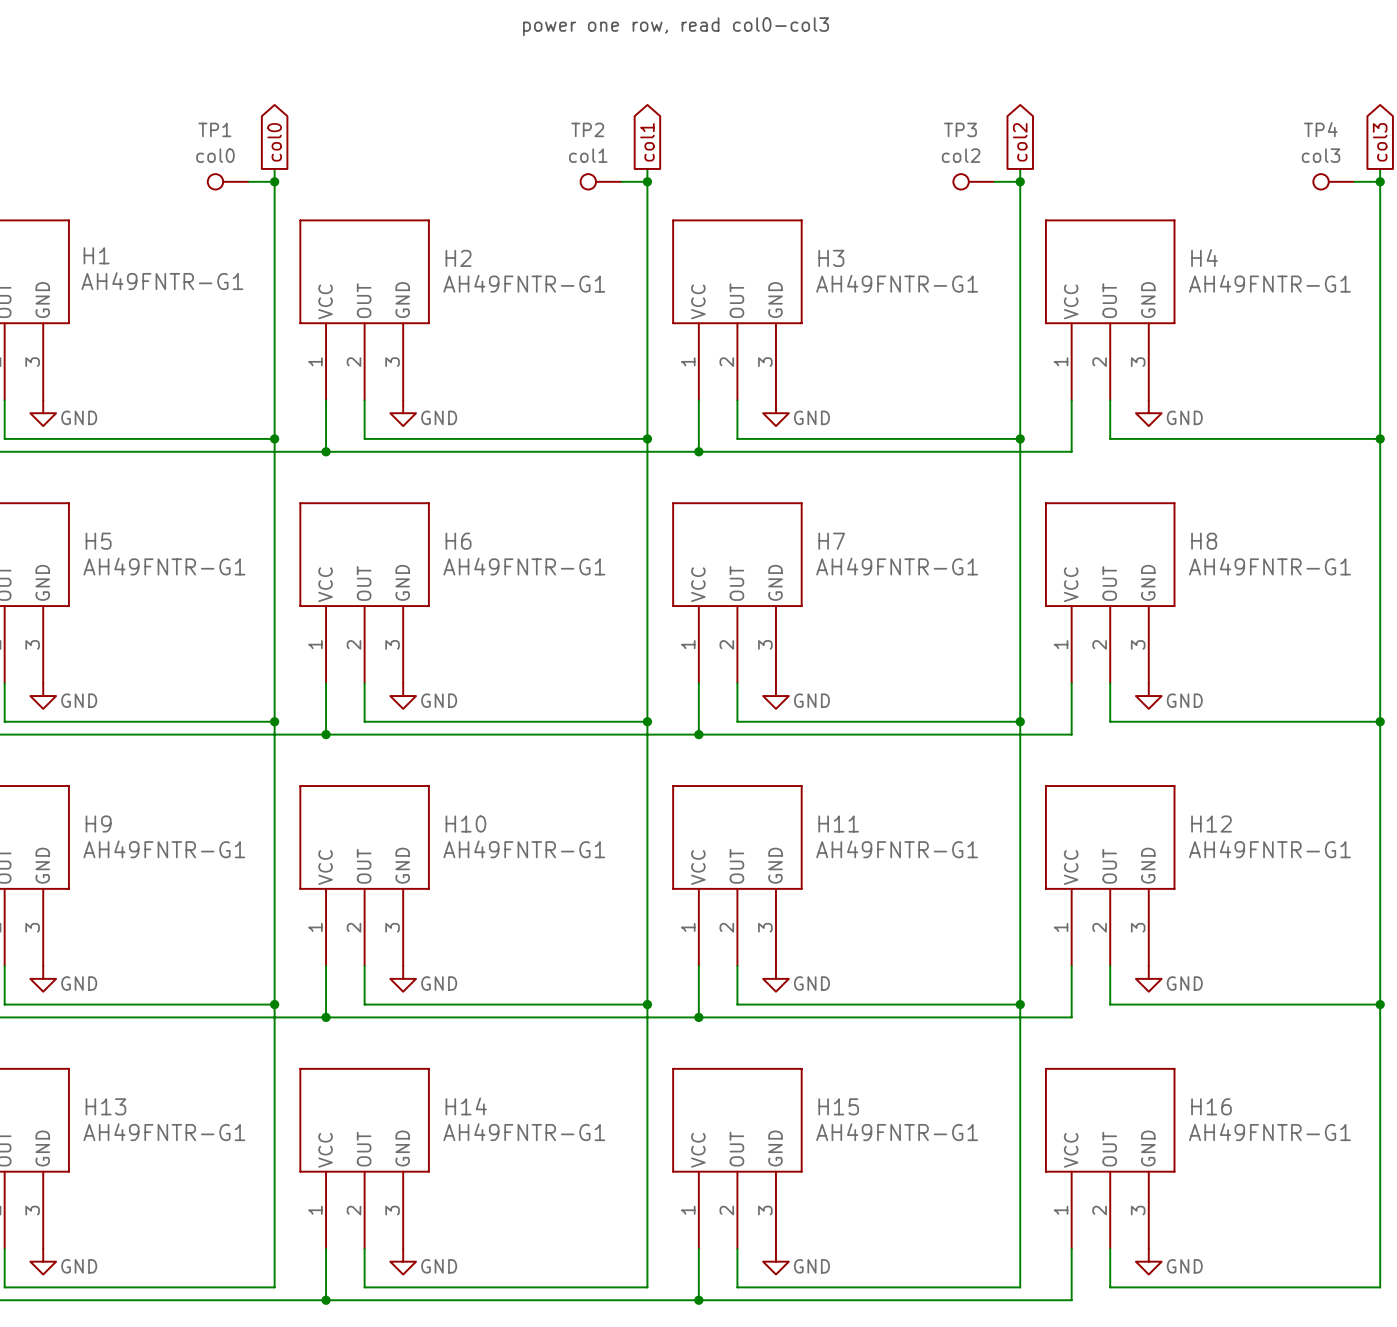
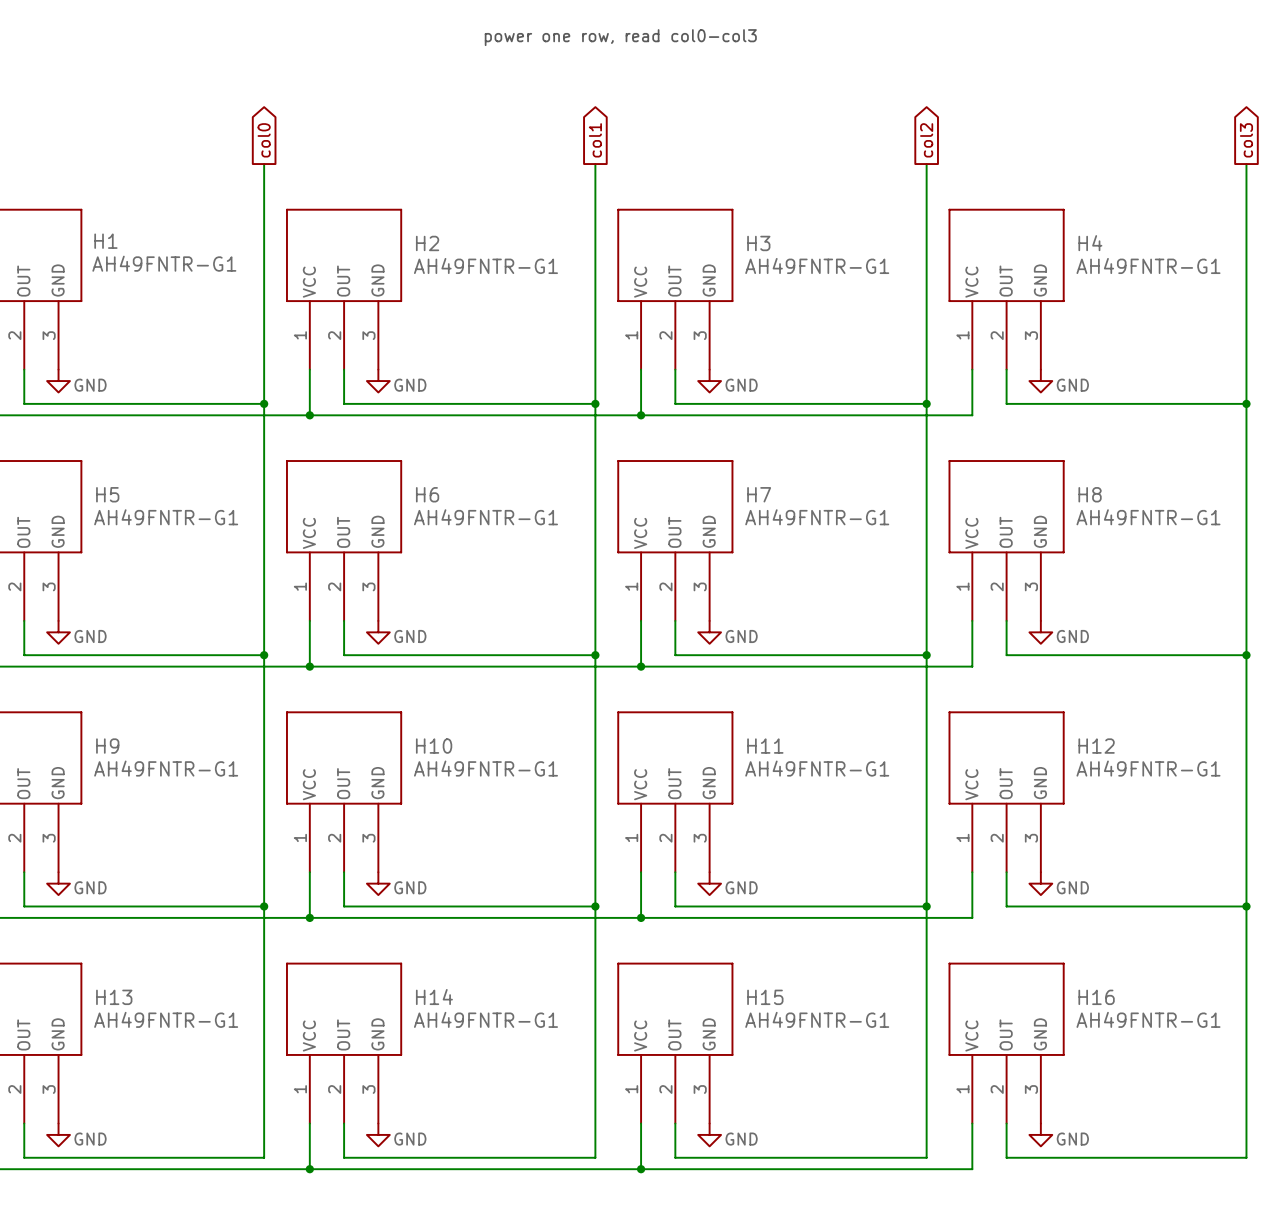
TP1: col0 (228, 181) -> none
wire: (248, 181) (274, 181) -> none
junction: (274, 181) -> none
TP2: col1 (601, 181) -> none
wire: (621, 181) (647, 181) -> none
junction: (647, 181) -> none
TP3: col2 (973, 181) -> none
wire: (994, 181) (1020, 181) -> none
junction: (1020, 181) -> none
TP4: col3 (1333, 181) -> none
wire: (1354, 181) (1380, 181) -> none
junction: (1380, 181) -> none

